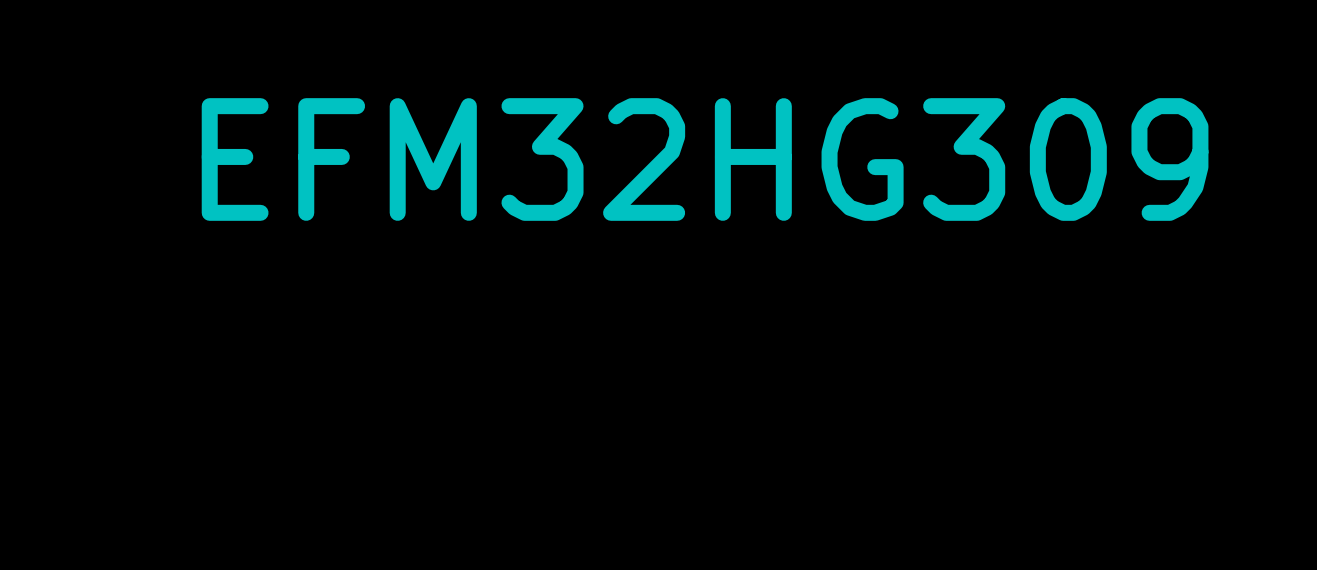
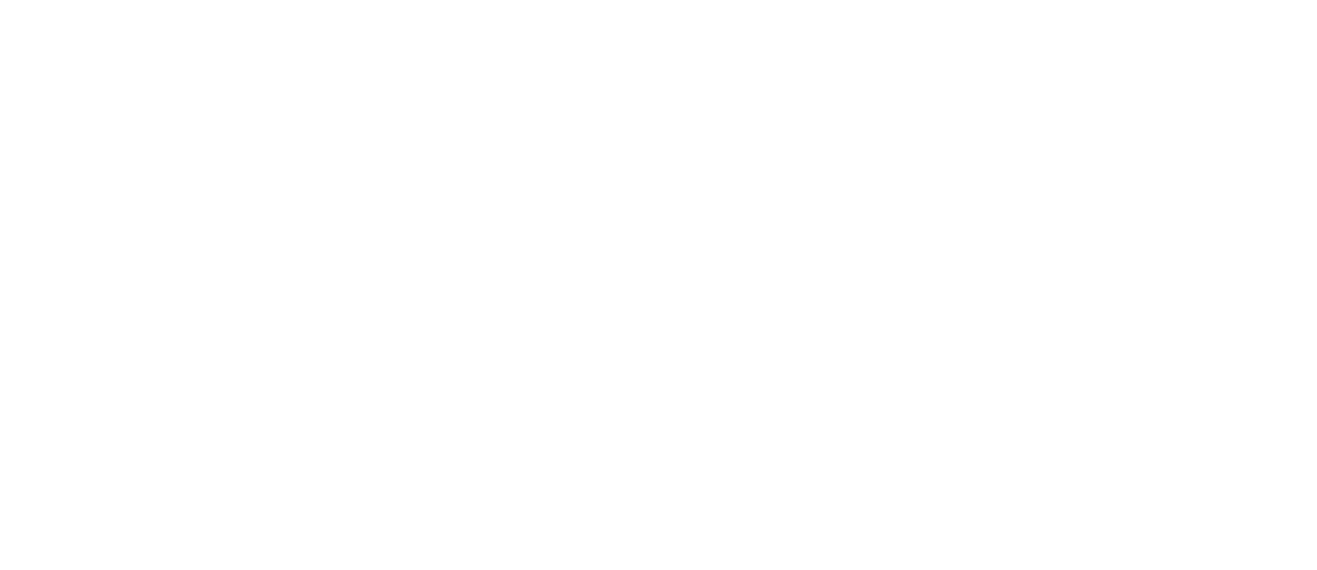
text: EFM32HG309 (705, 159) -> none

